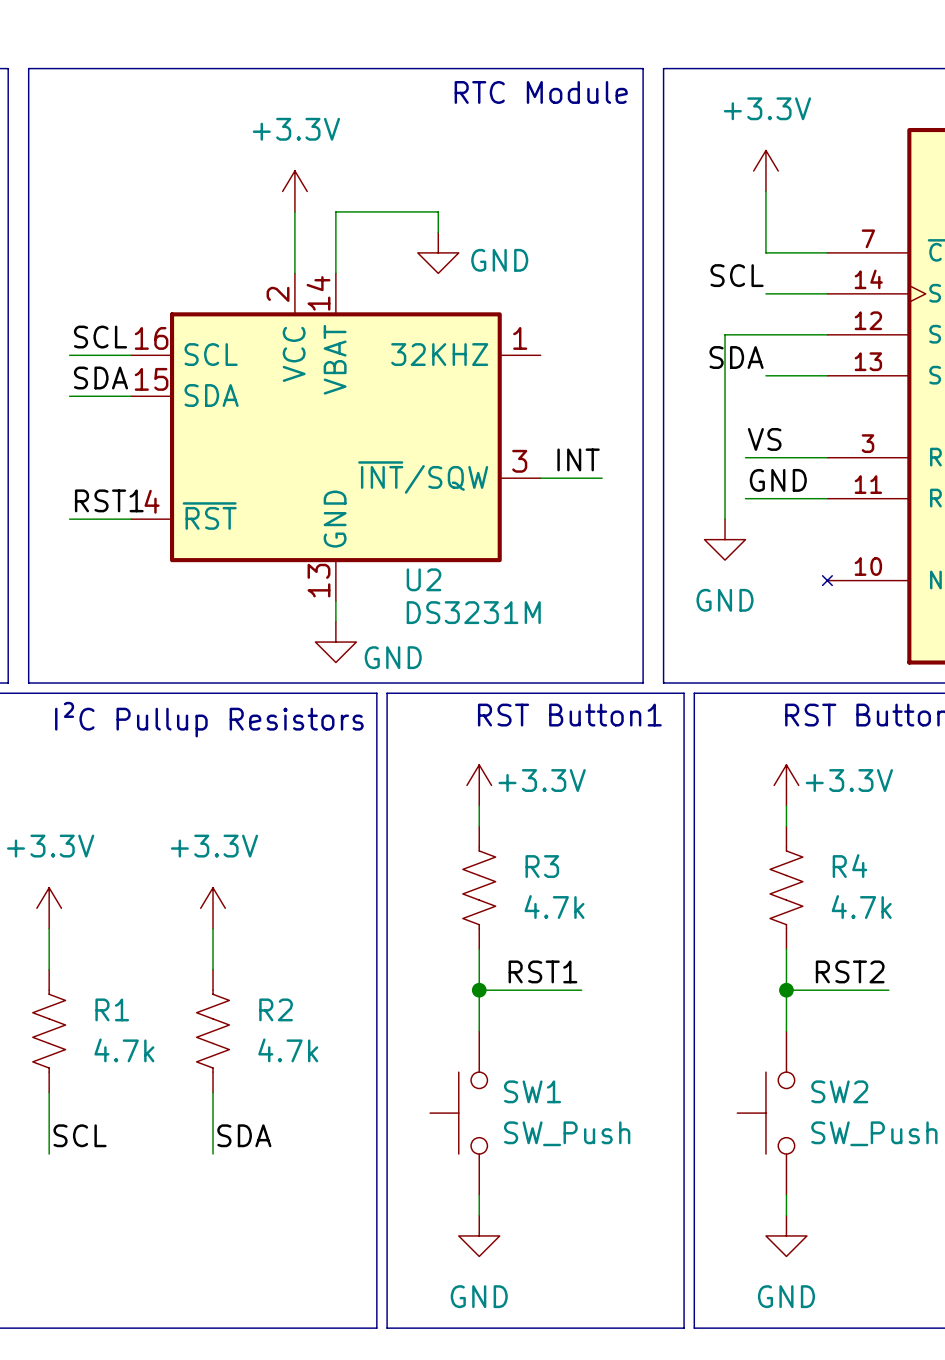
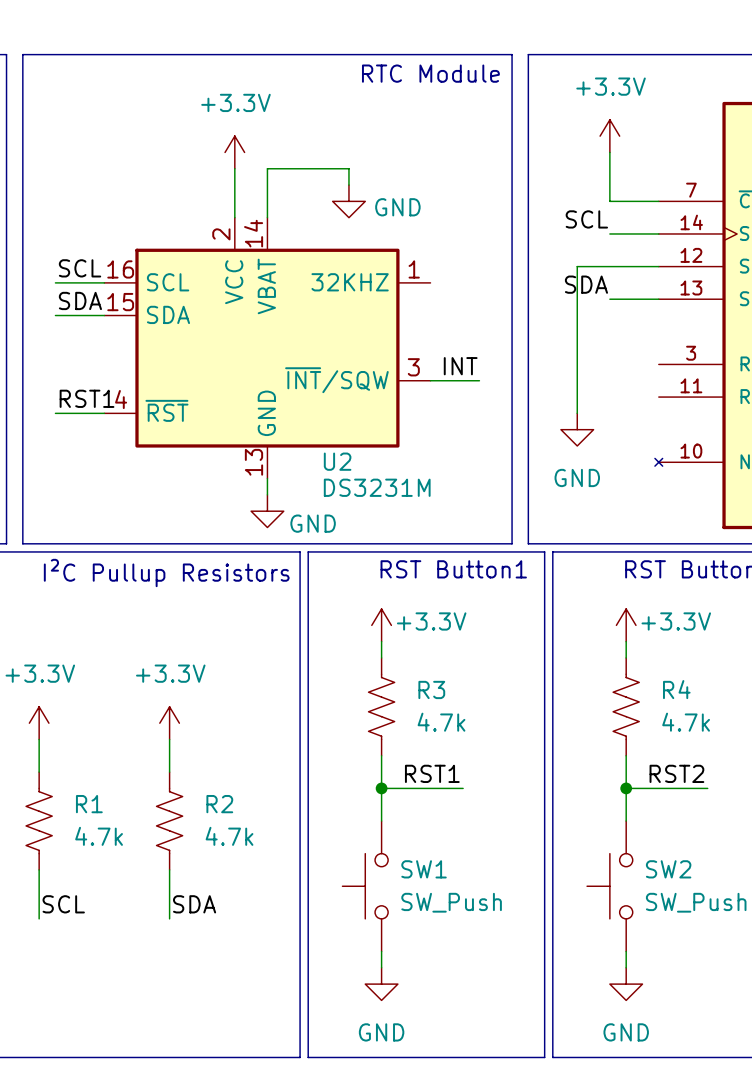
label: VS (764, 439) -> none
wire: (745, 457) (827, 457) -> none
label: GND (778, 480) -> none
wire: (745, 498) (827, 498) -> none

